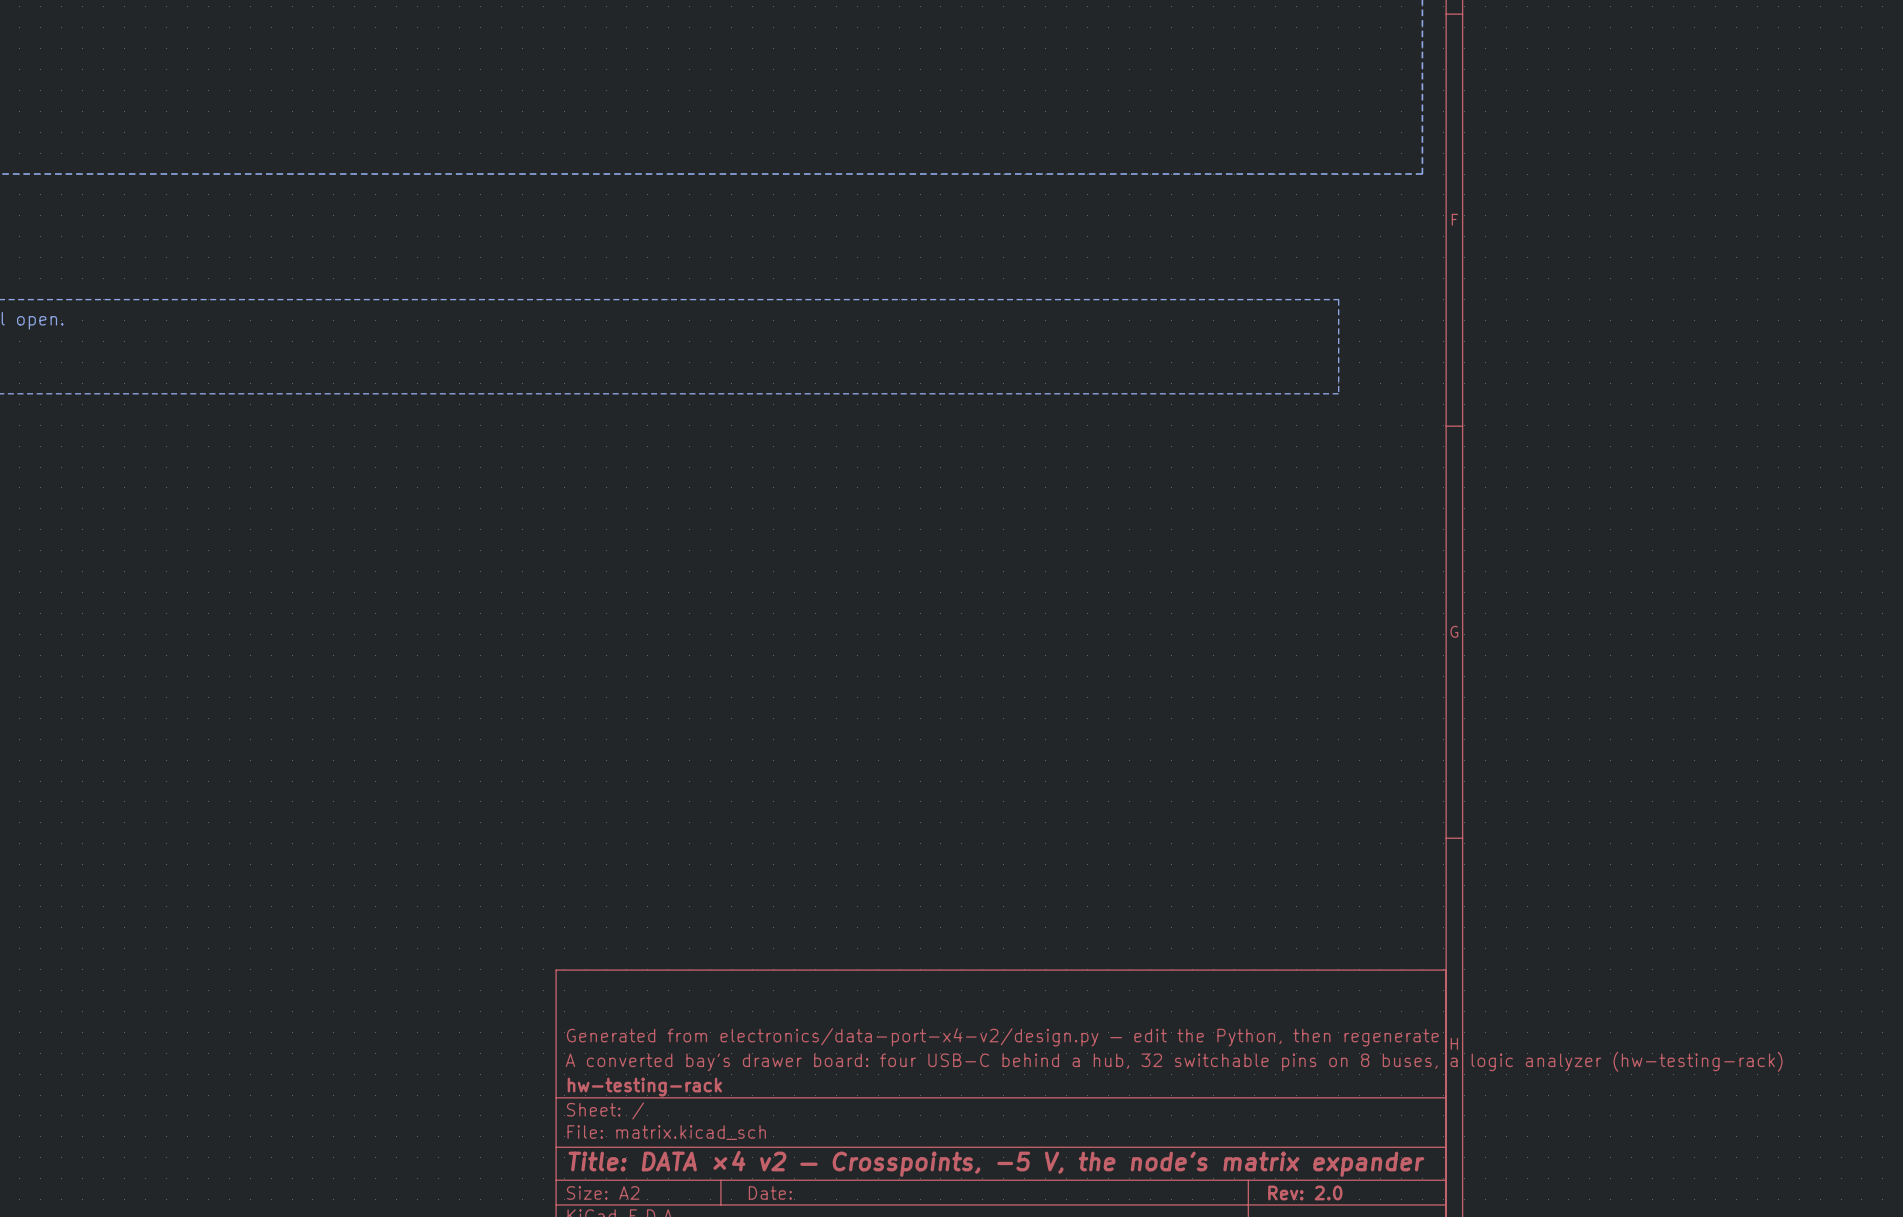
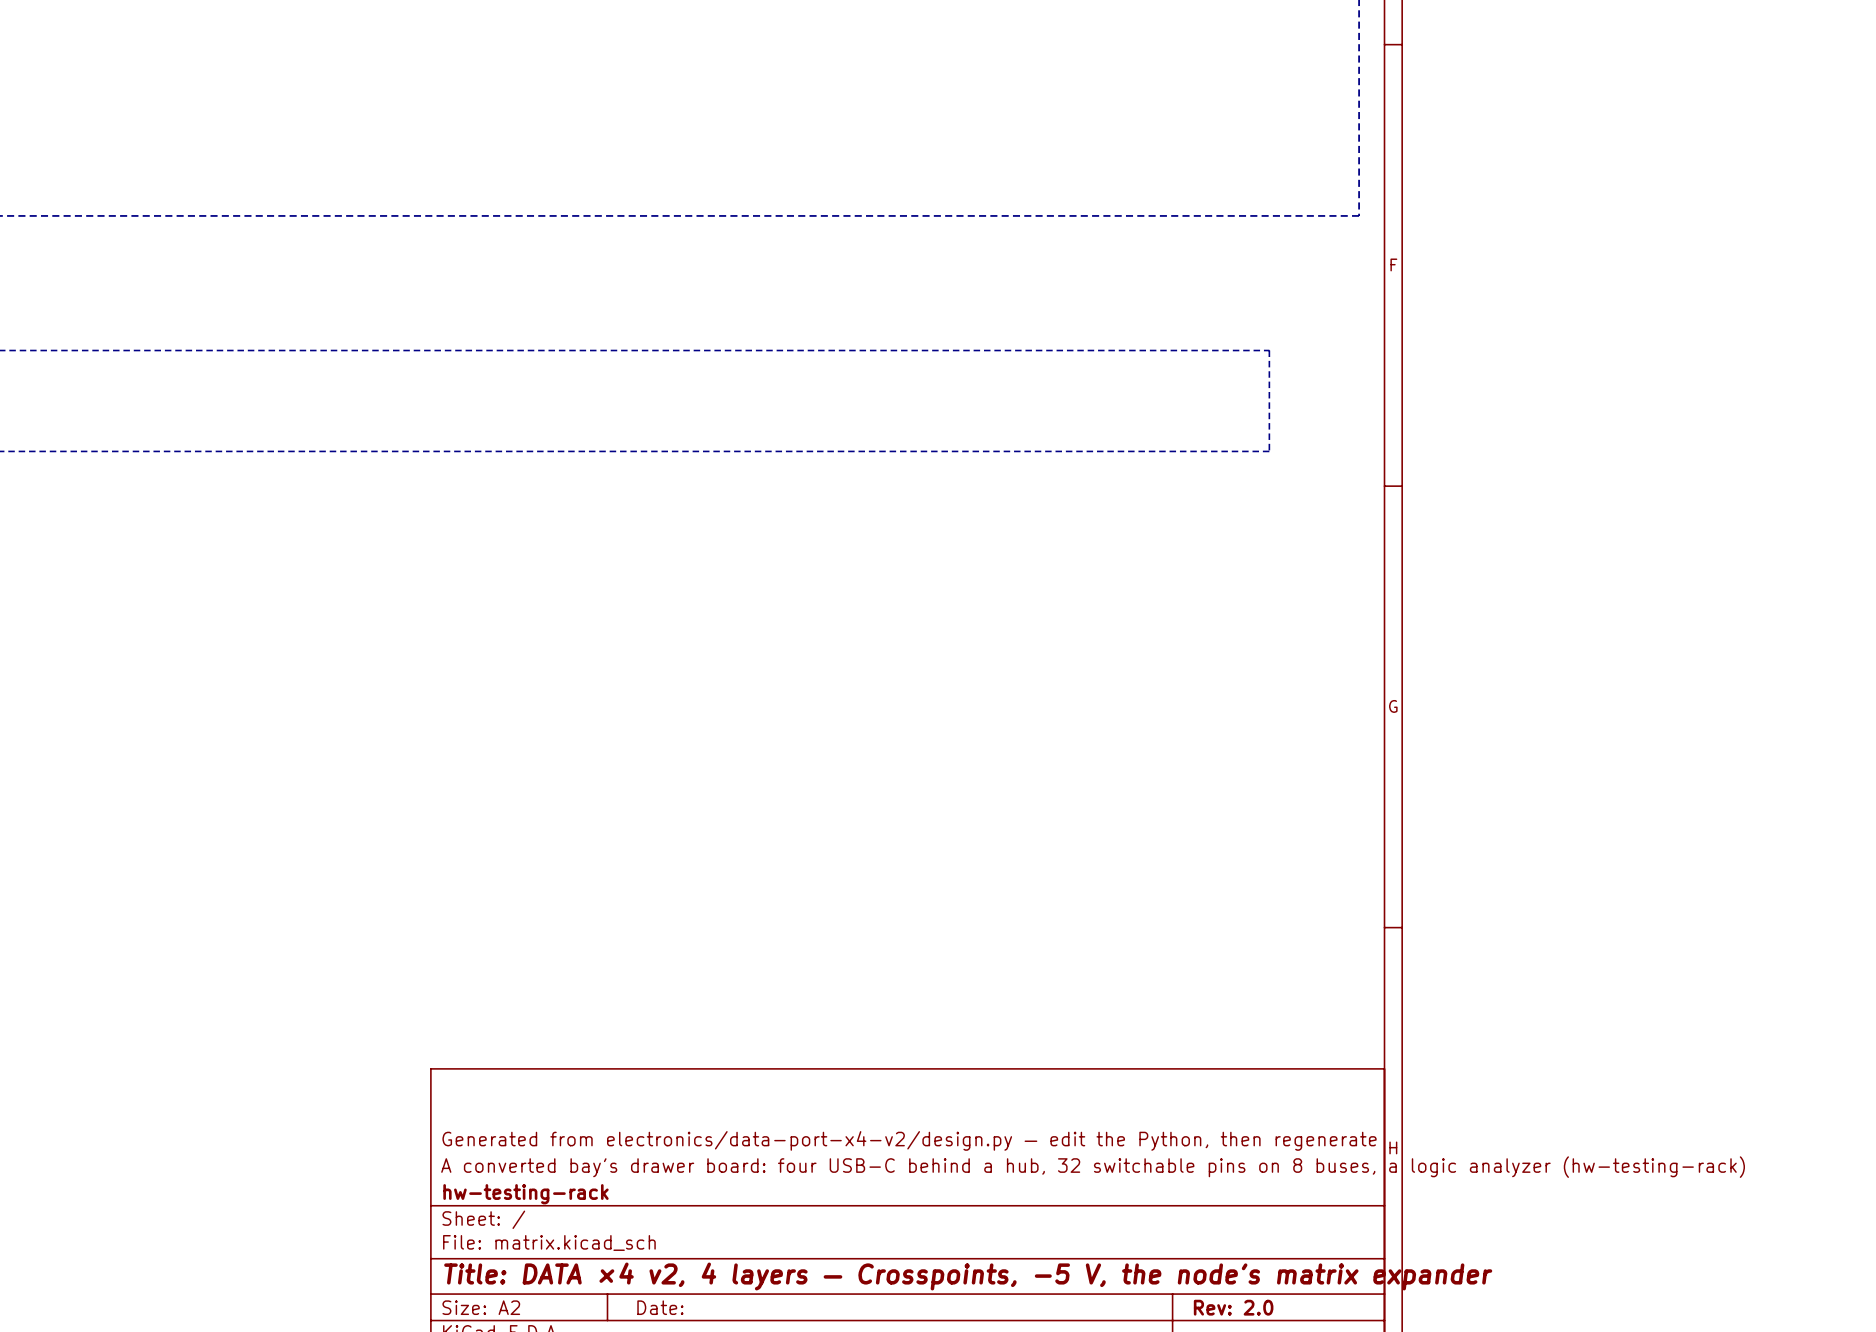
title block: Title: DATA ×4 v2 — Crosspoints, −5 V, the node's matrix expander (996, 1163) -> Title: DATA ×4 v2, 4 layers — Crosspoints, −5 V, the node's matrix expander (968, 1276)

